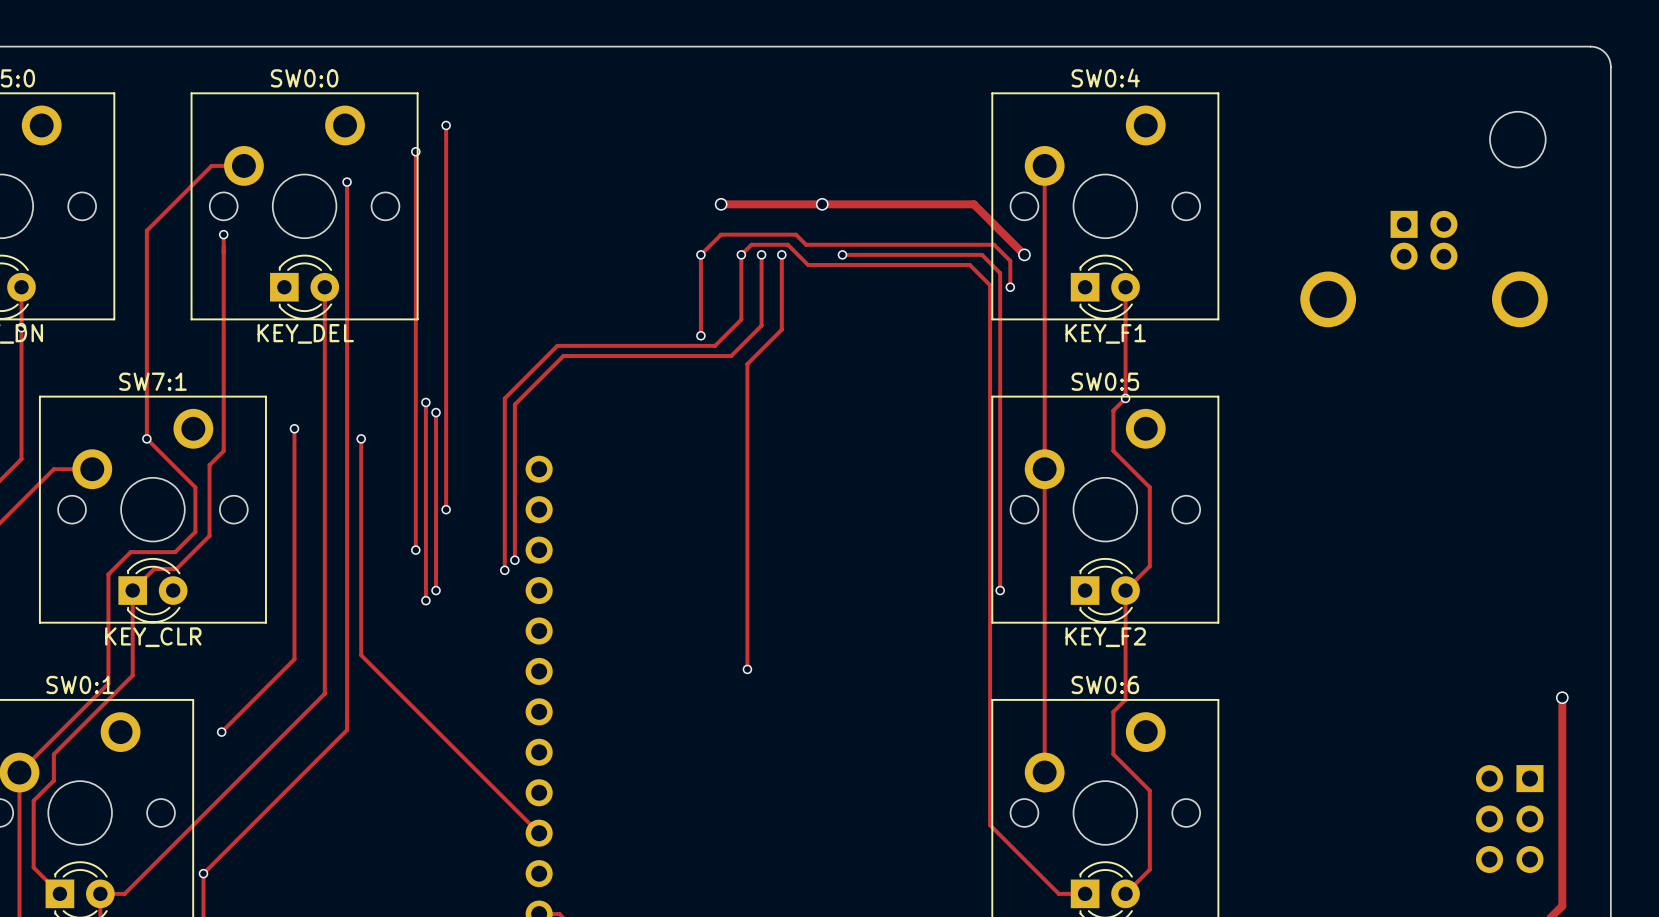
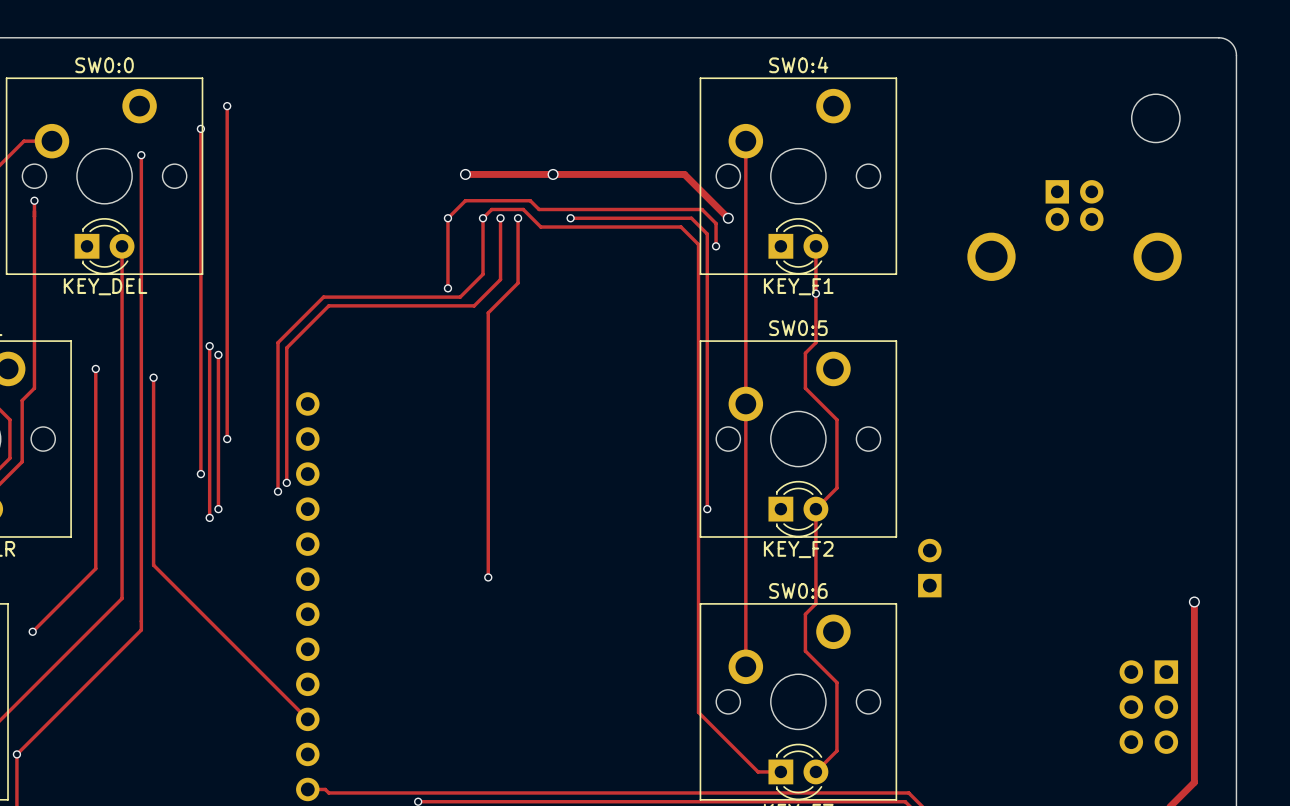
via position: (1125, 398) -> (815, 293)
part: none -> (929, 568)

